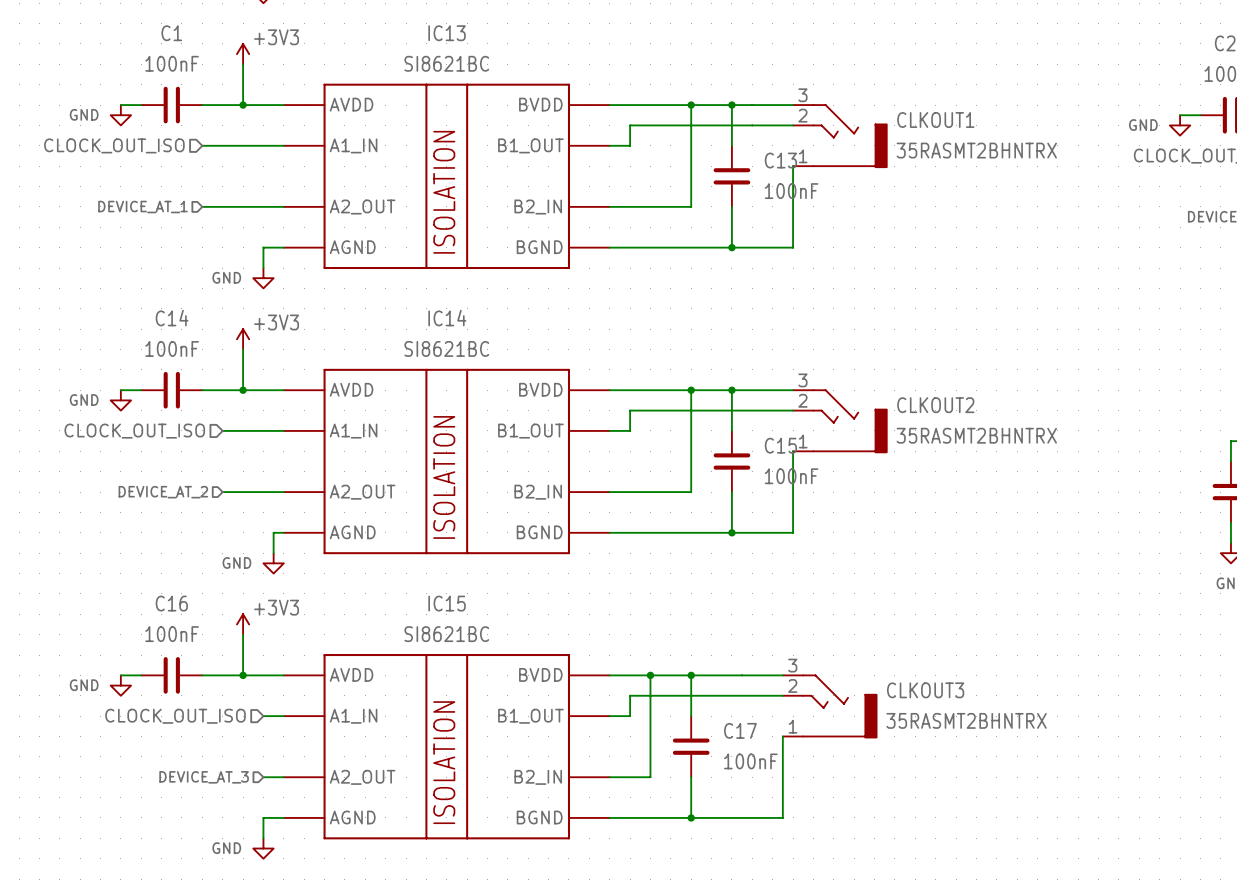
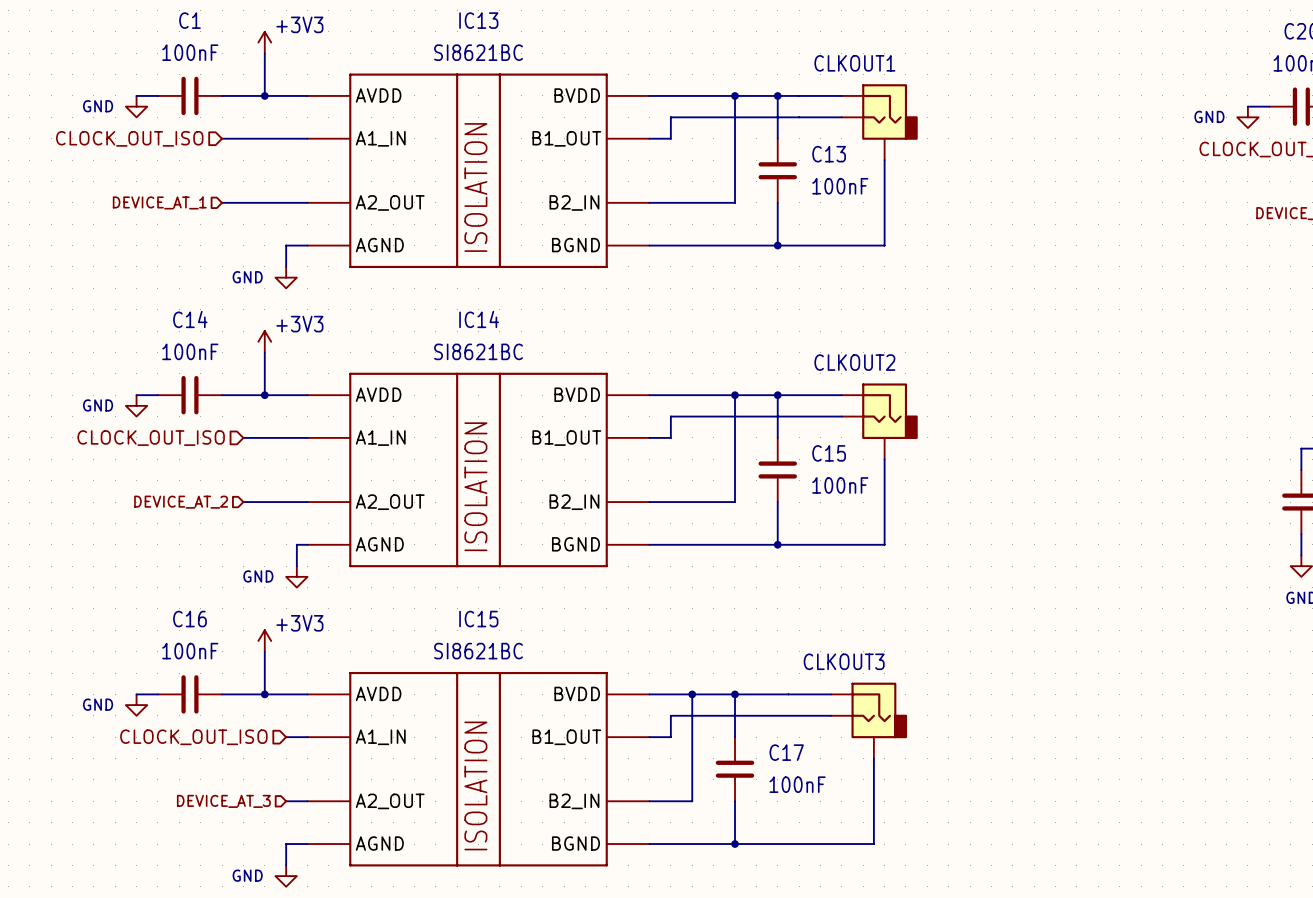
CLKOUT1 symbol: [793, 104, 887, 168] -> [841, 84, 918, 161]
CLKOUT1 name position: CLKOUT1 (935, 120) -> CLKOUT1 (854, 63)
CLKOUT1 value: 35RASMT2BHNTRX (976, 150) -> none
wire: (793, 166) (793, 247) -> (884, 160) (884, 245) (841, 245)
CLKOUT2 symbol: [793, 389, 887, 453] -> [841, 383, 918, 460]
CLKOUT2 name position: CLKOUT2 (935, 405) -> CLKOUT2 (854, 362)
CLKOUT2 value: 35RASMT2BHNTRX (976, 435) -> none
wire: (793, 451) (793, 532) -> (884, 459) (884, 544) (841, 544)
CLKOUT3 symbol: [782, 674, 877, 738] -> [831, 682, 908, 759]
CLKOUT3 name position: CLKOUT3 (925, 690) -> CLKOUT3 (844, 661)
CLKOUT3 value: 35RASMT2BHNTRX (966, 720) -> none
wire: (782, 736) (782, 817) -> (873, 758) (873, 844) (831, 844)

